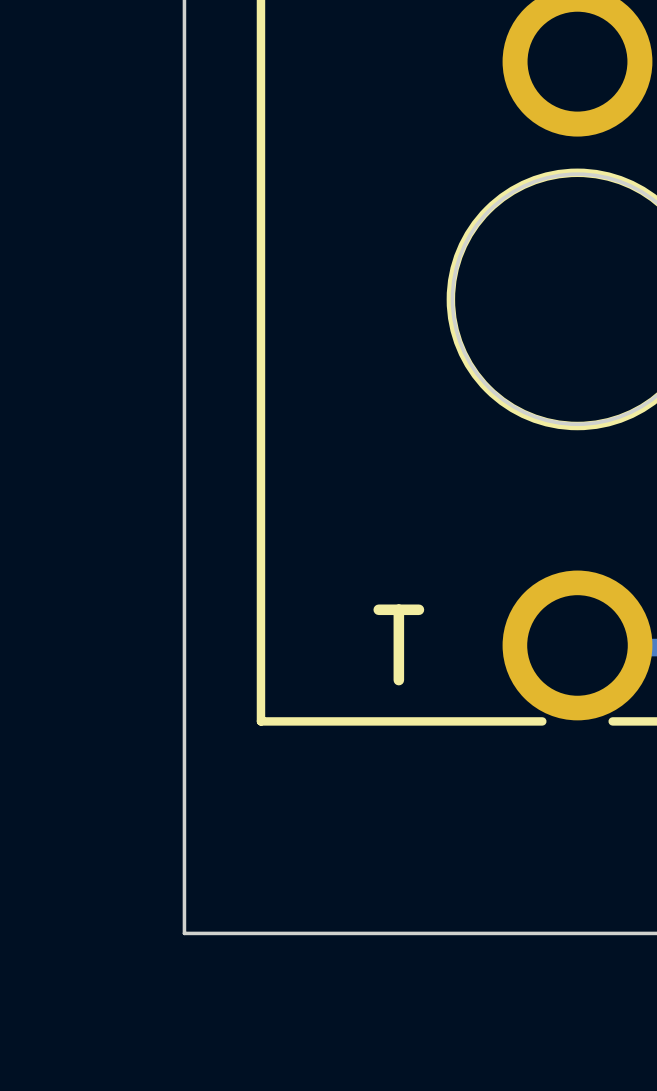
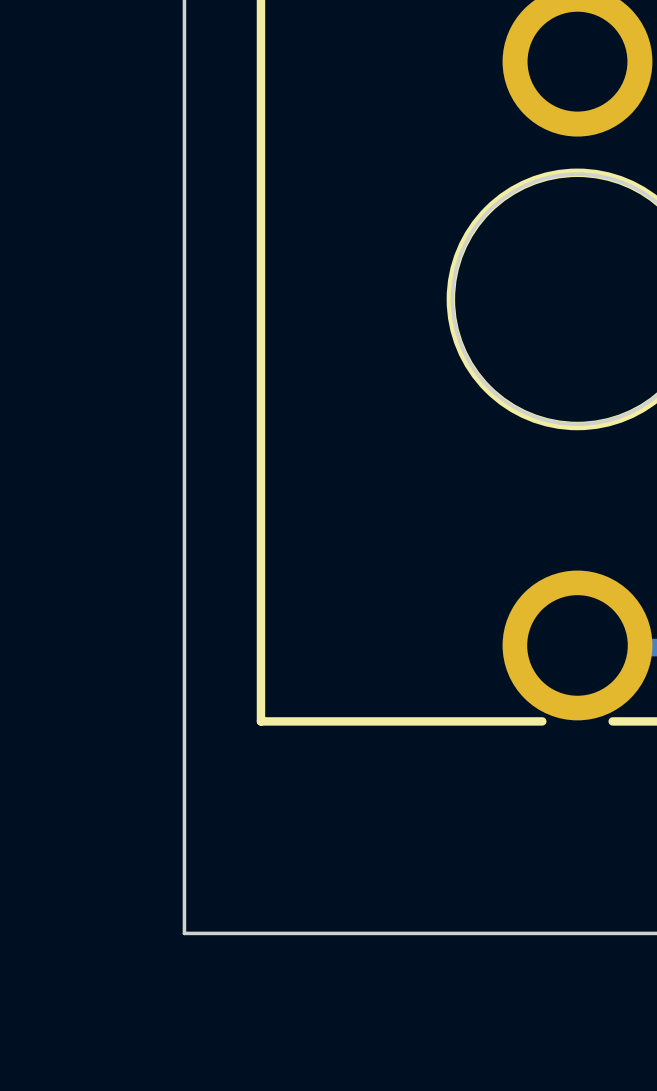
text: T (398, 644) -> none

